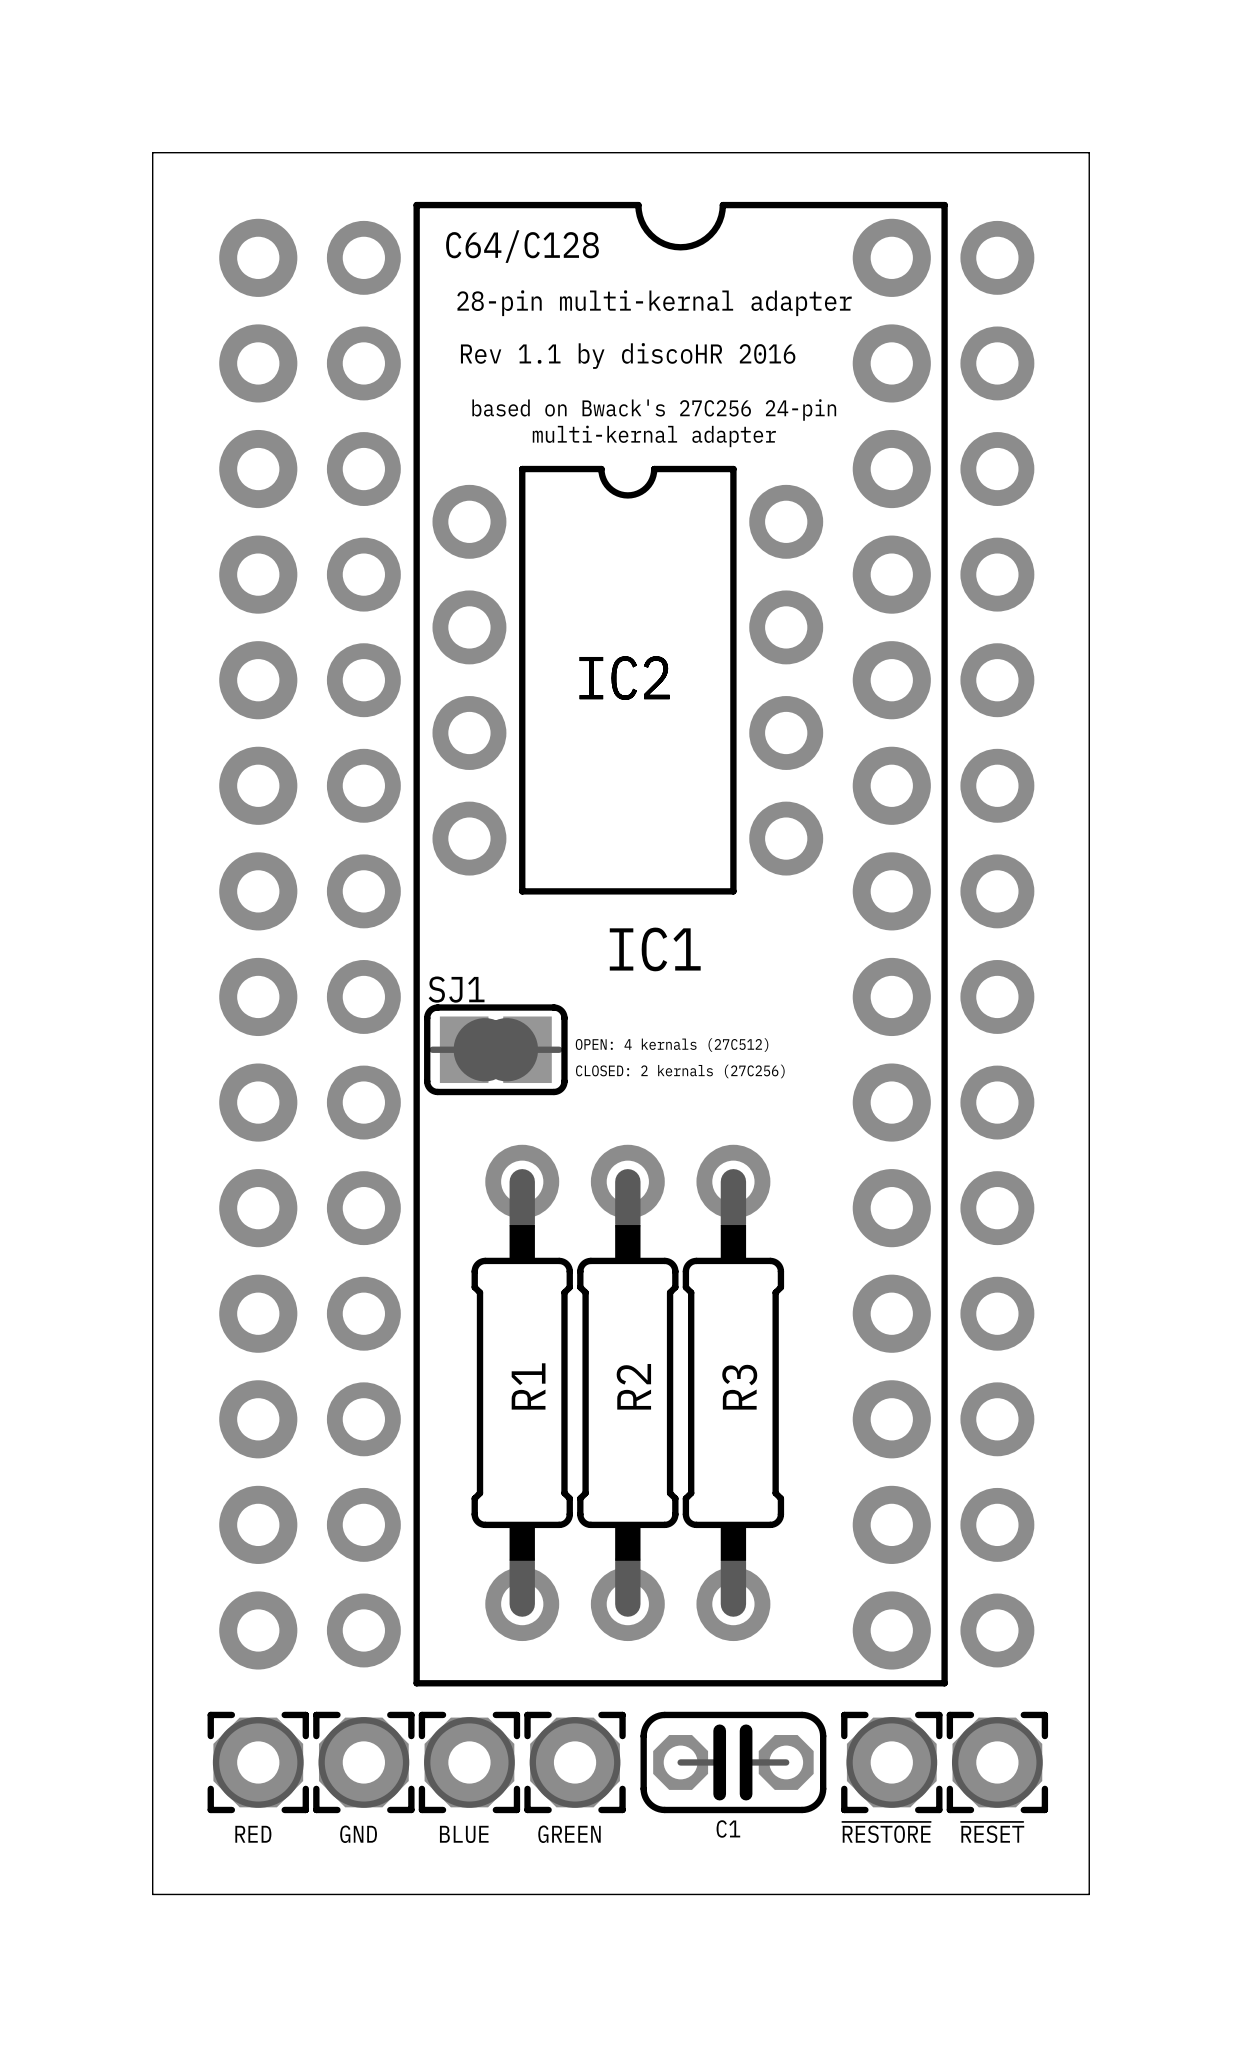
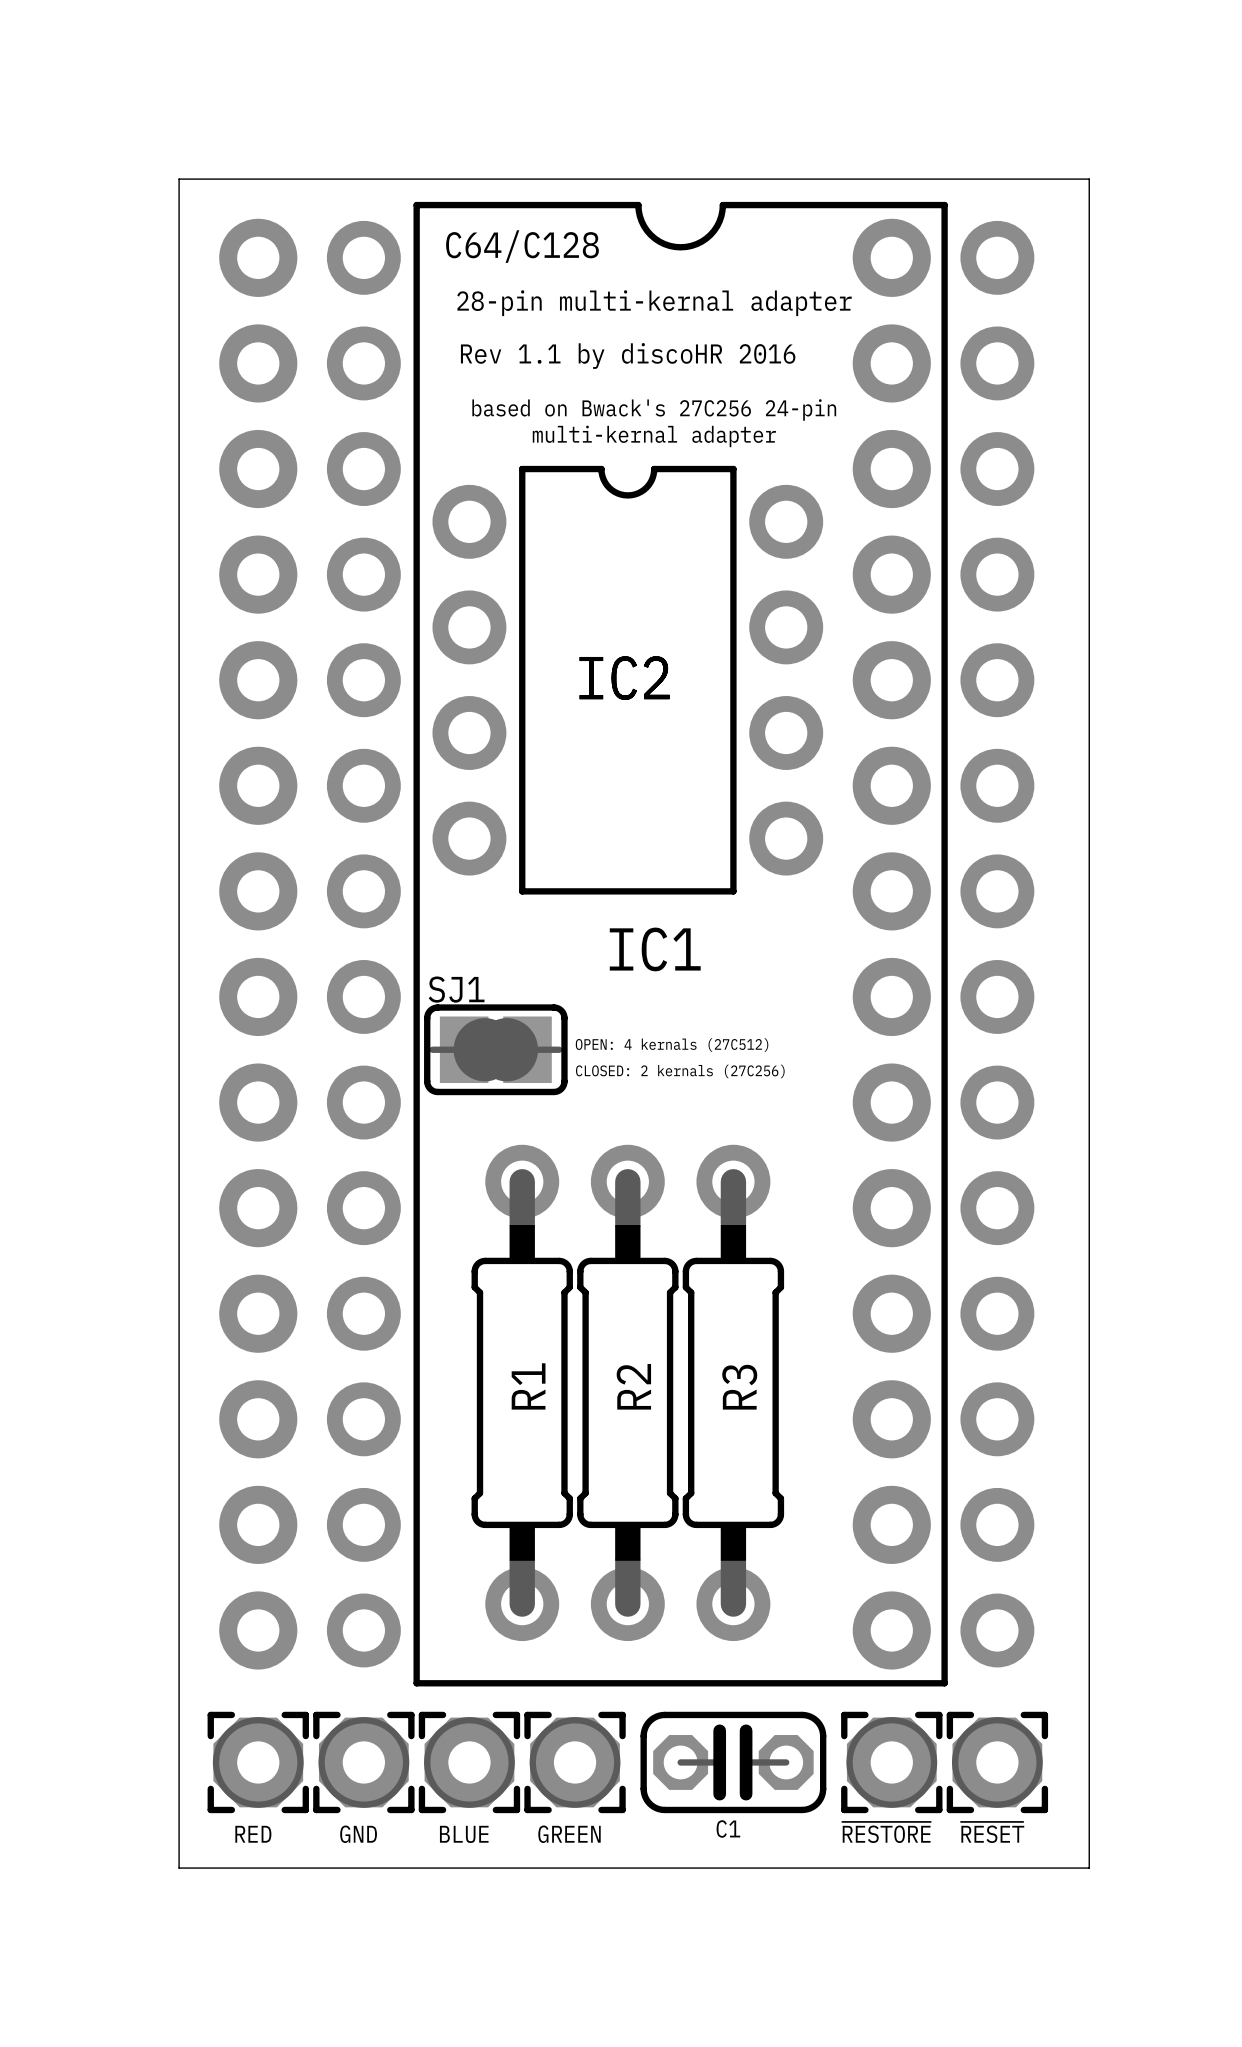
board edge: (1089, 179) (1089, 152) (152, 152) (152, 1894) (1089, 1894) (1089, 1868) -> (1089, 179) (179, 179) (179, 1868) (1089, 1868)

